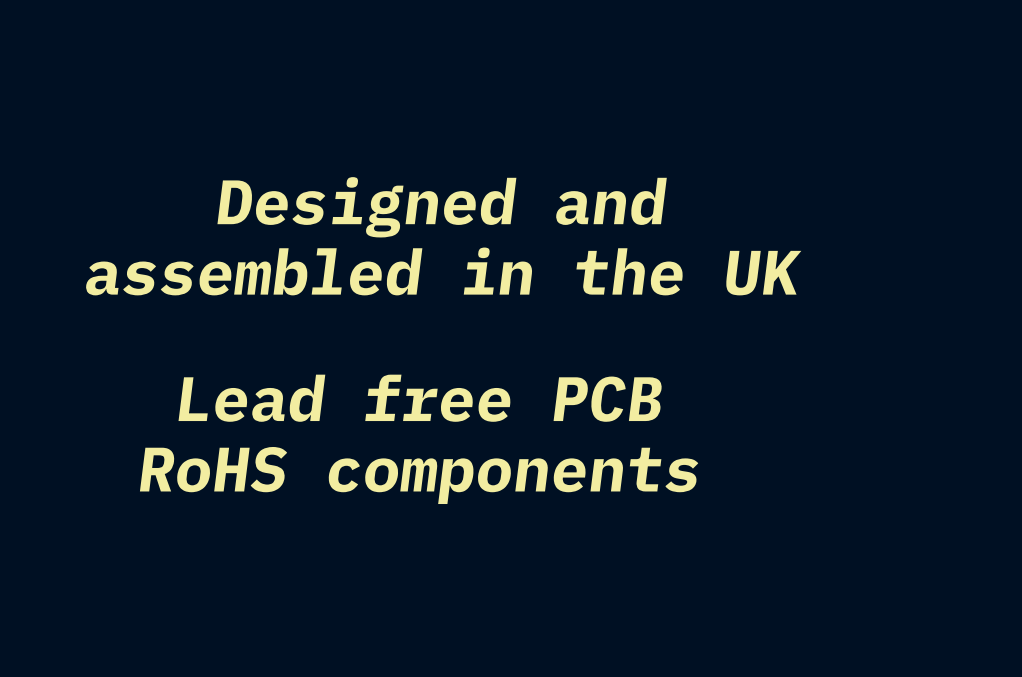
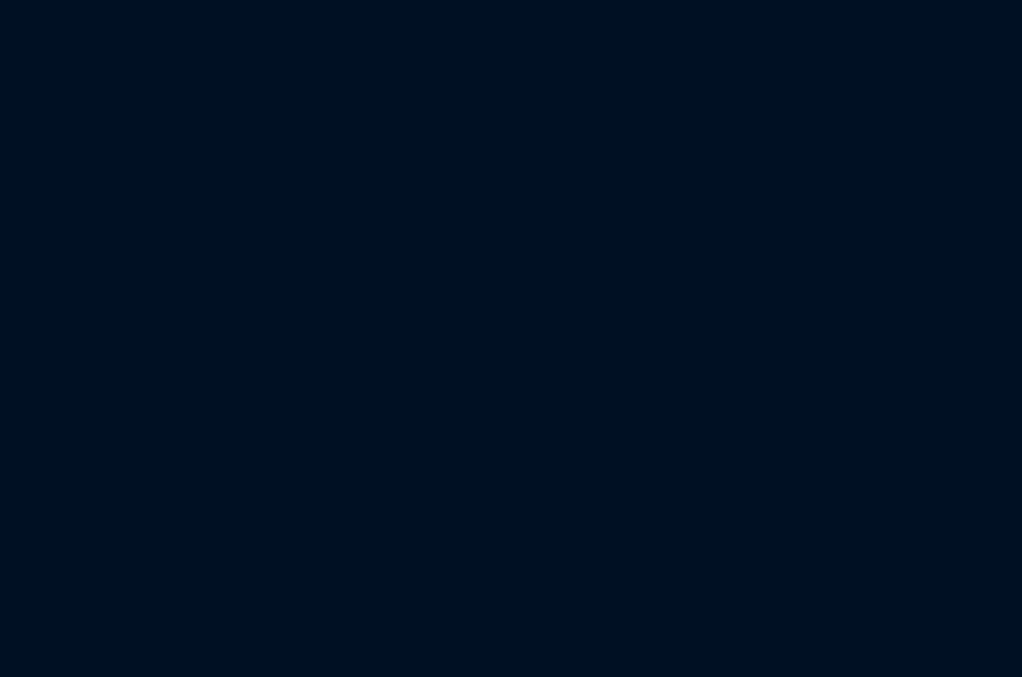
text: Designed and (442, 207) -> none
text: assembled in the UK (443, 271) -> none
text: Lead free PCB (420, 398) -> none
text: RoHS components (419, 475) -> none

